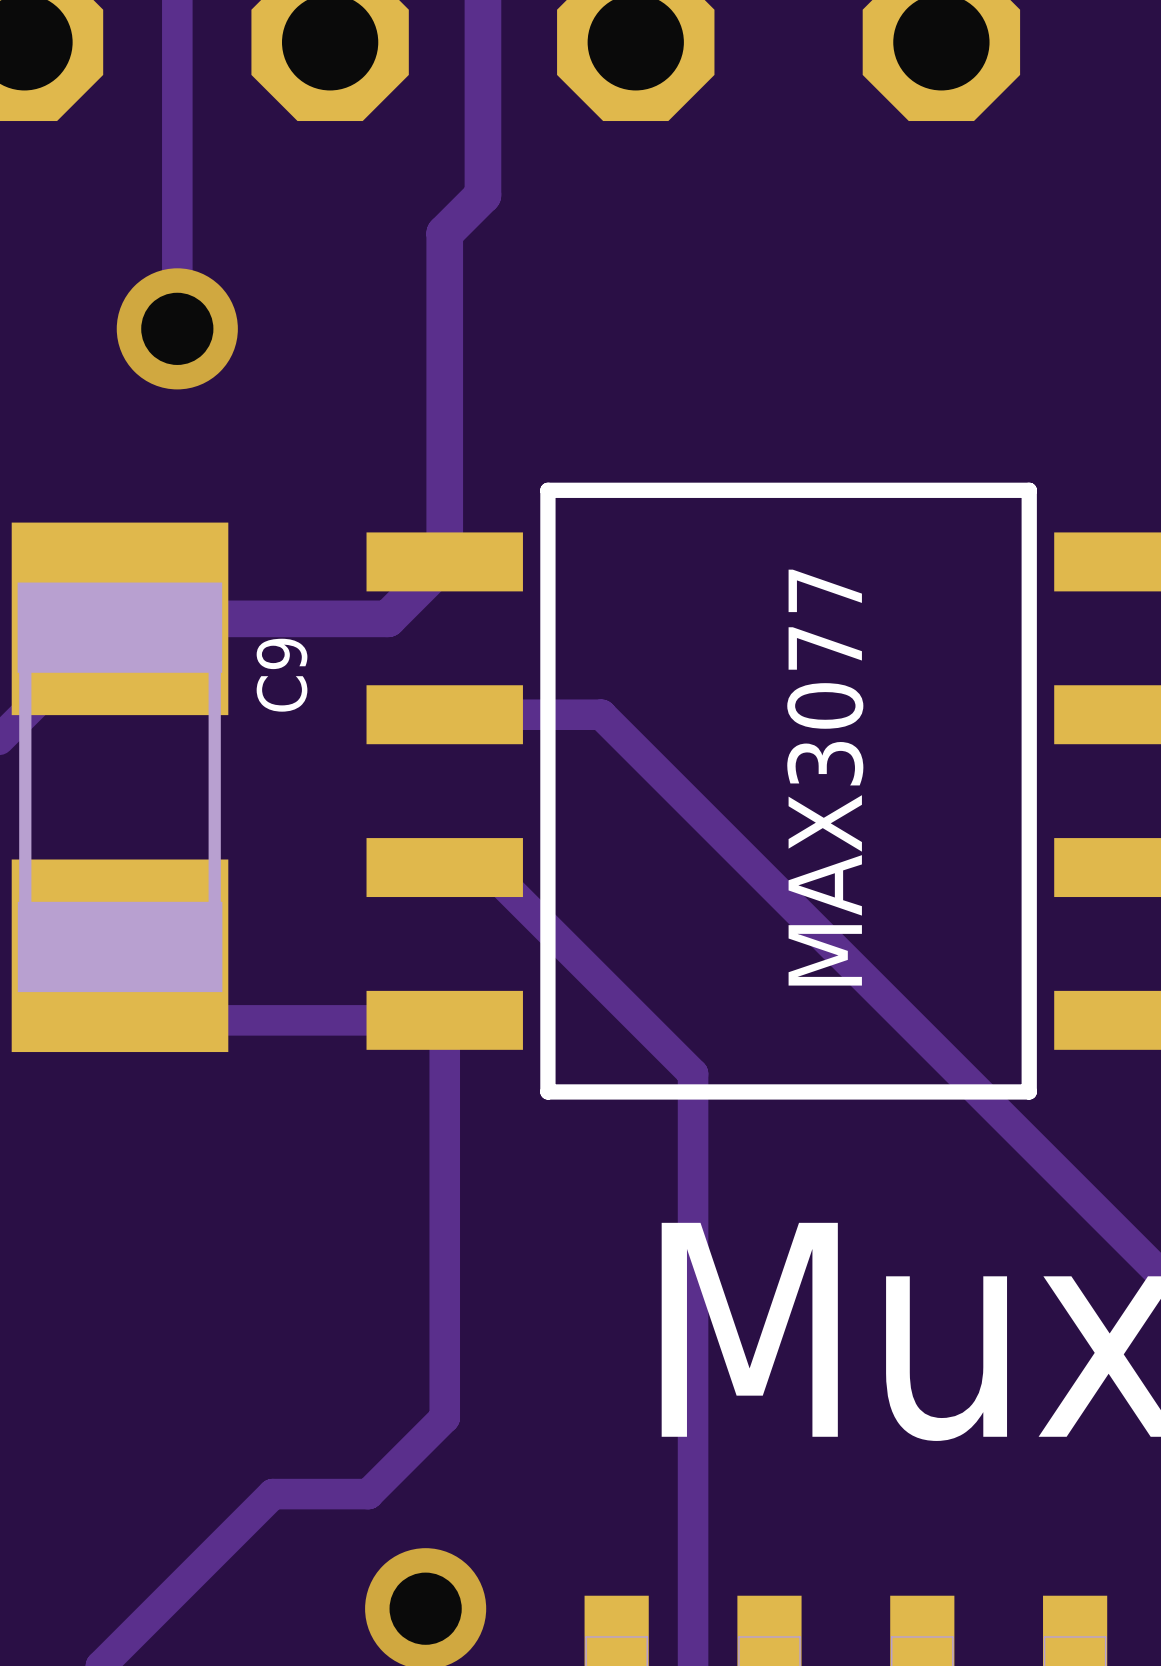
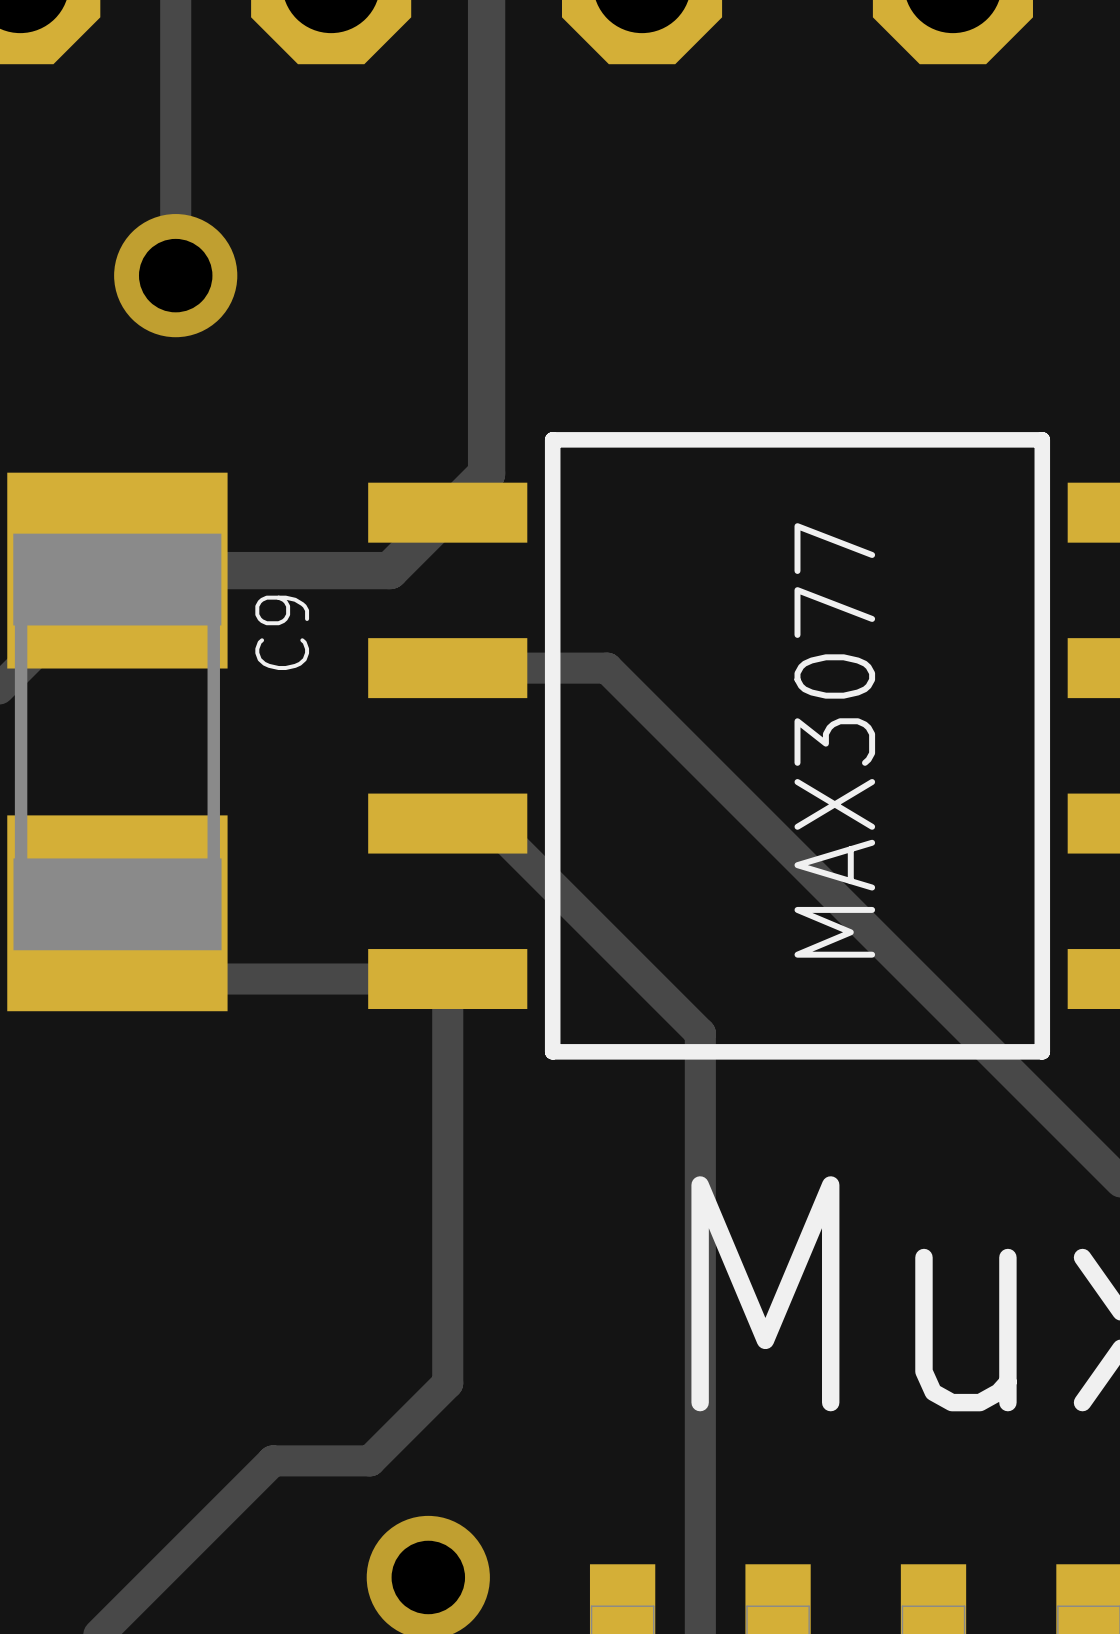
track: (482, 195) (444, 233) (444, 561) -> (486, 139) (486, 473) (447, 512)

